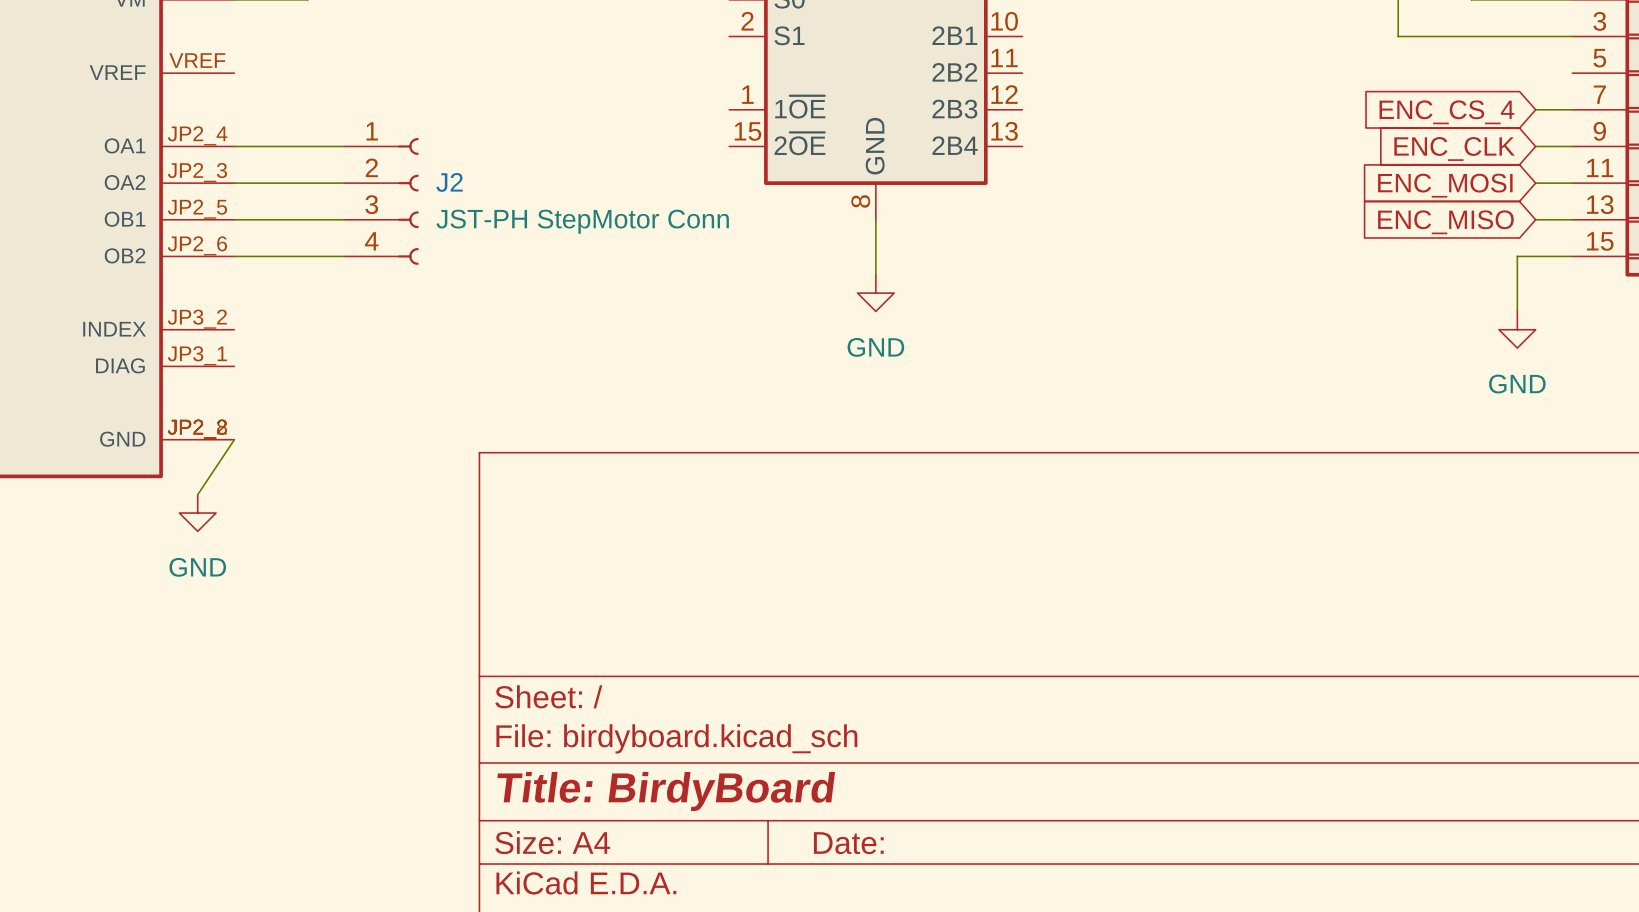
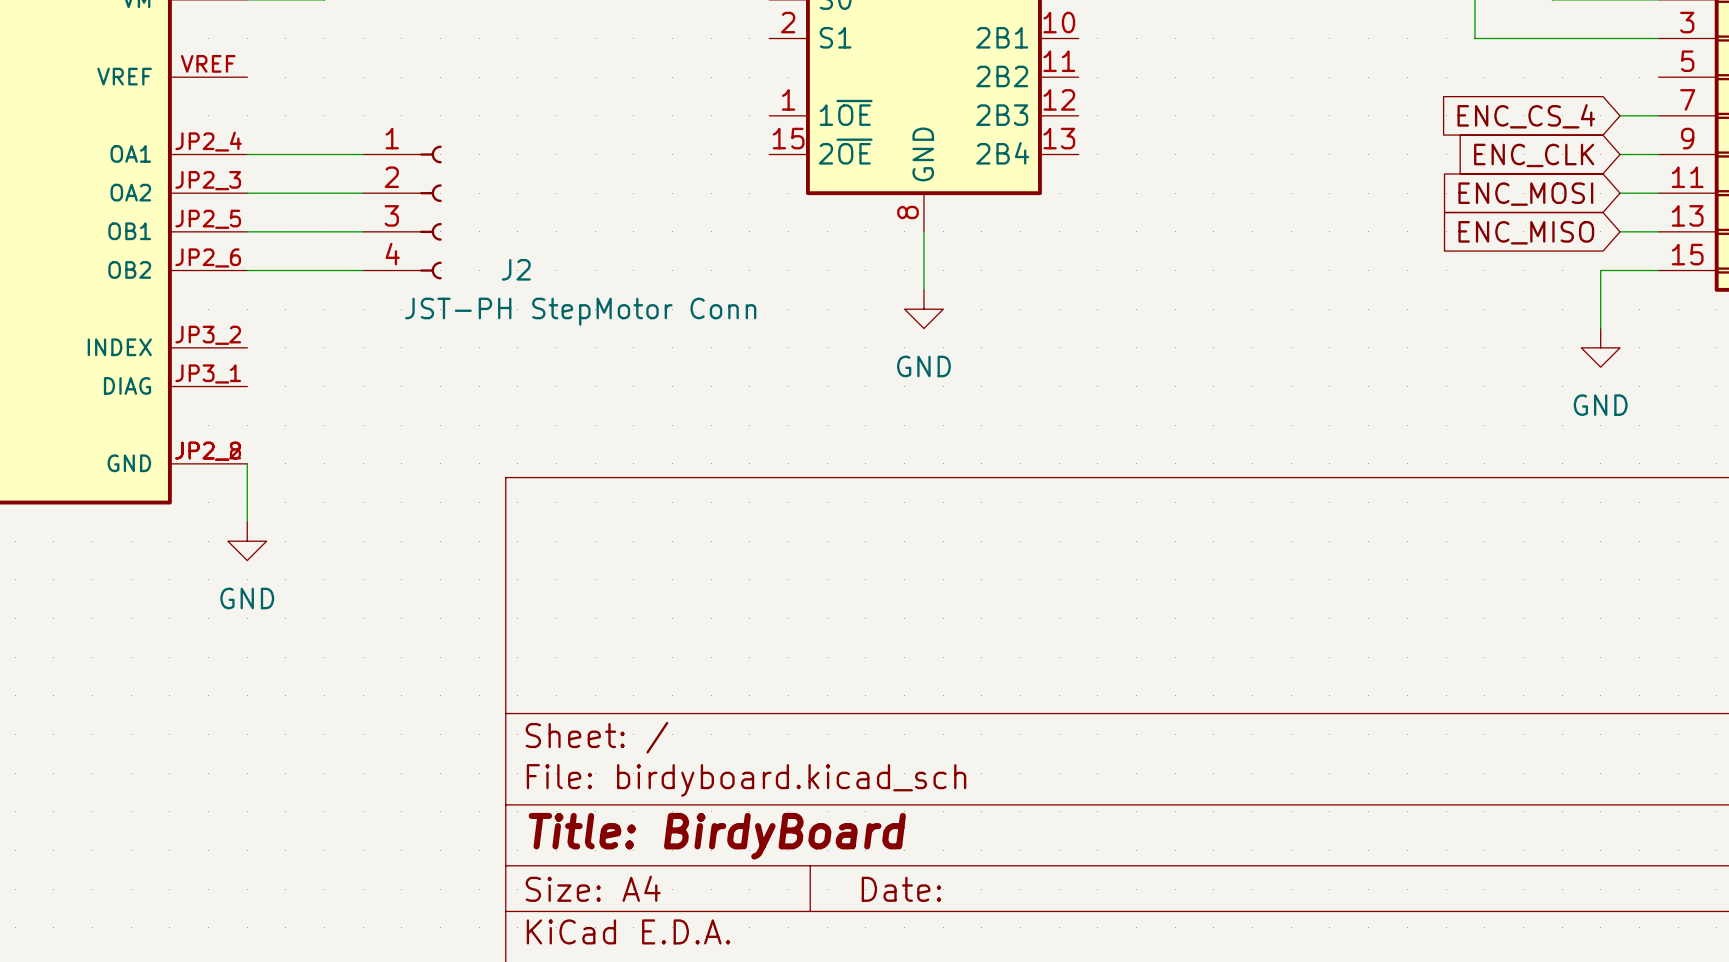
J2 name position: J2 (449, 182) -> J2 (516, 269)
J2 value position: JST-PH StepMotor Conn (582, 221) -> JST-PH StepMotor Conn (580, 311)
wire: (234, 439) (197, 494) -> (247, 463) (247, 521)
power symbol position: GND (197, 513) -> GND (247, 541)

